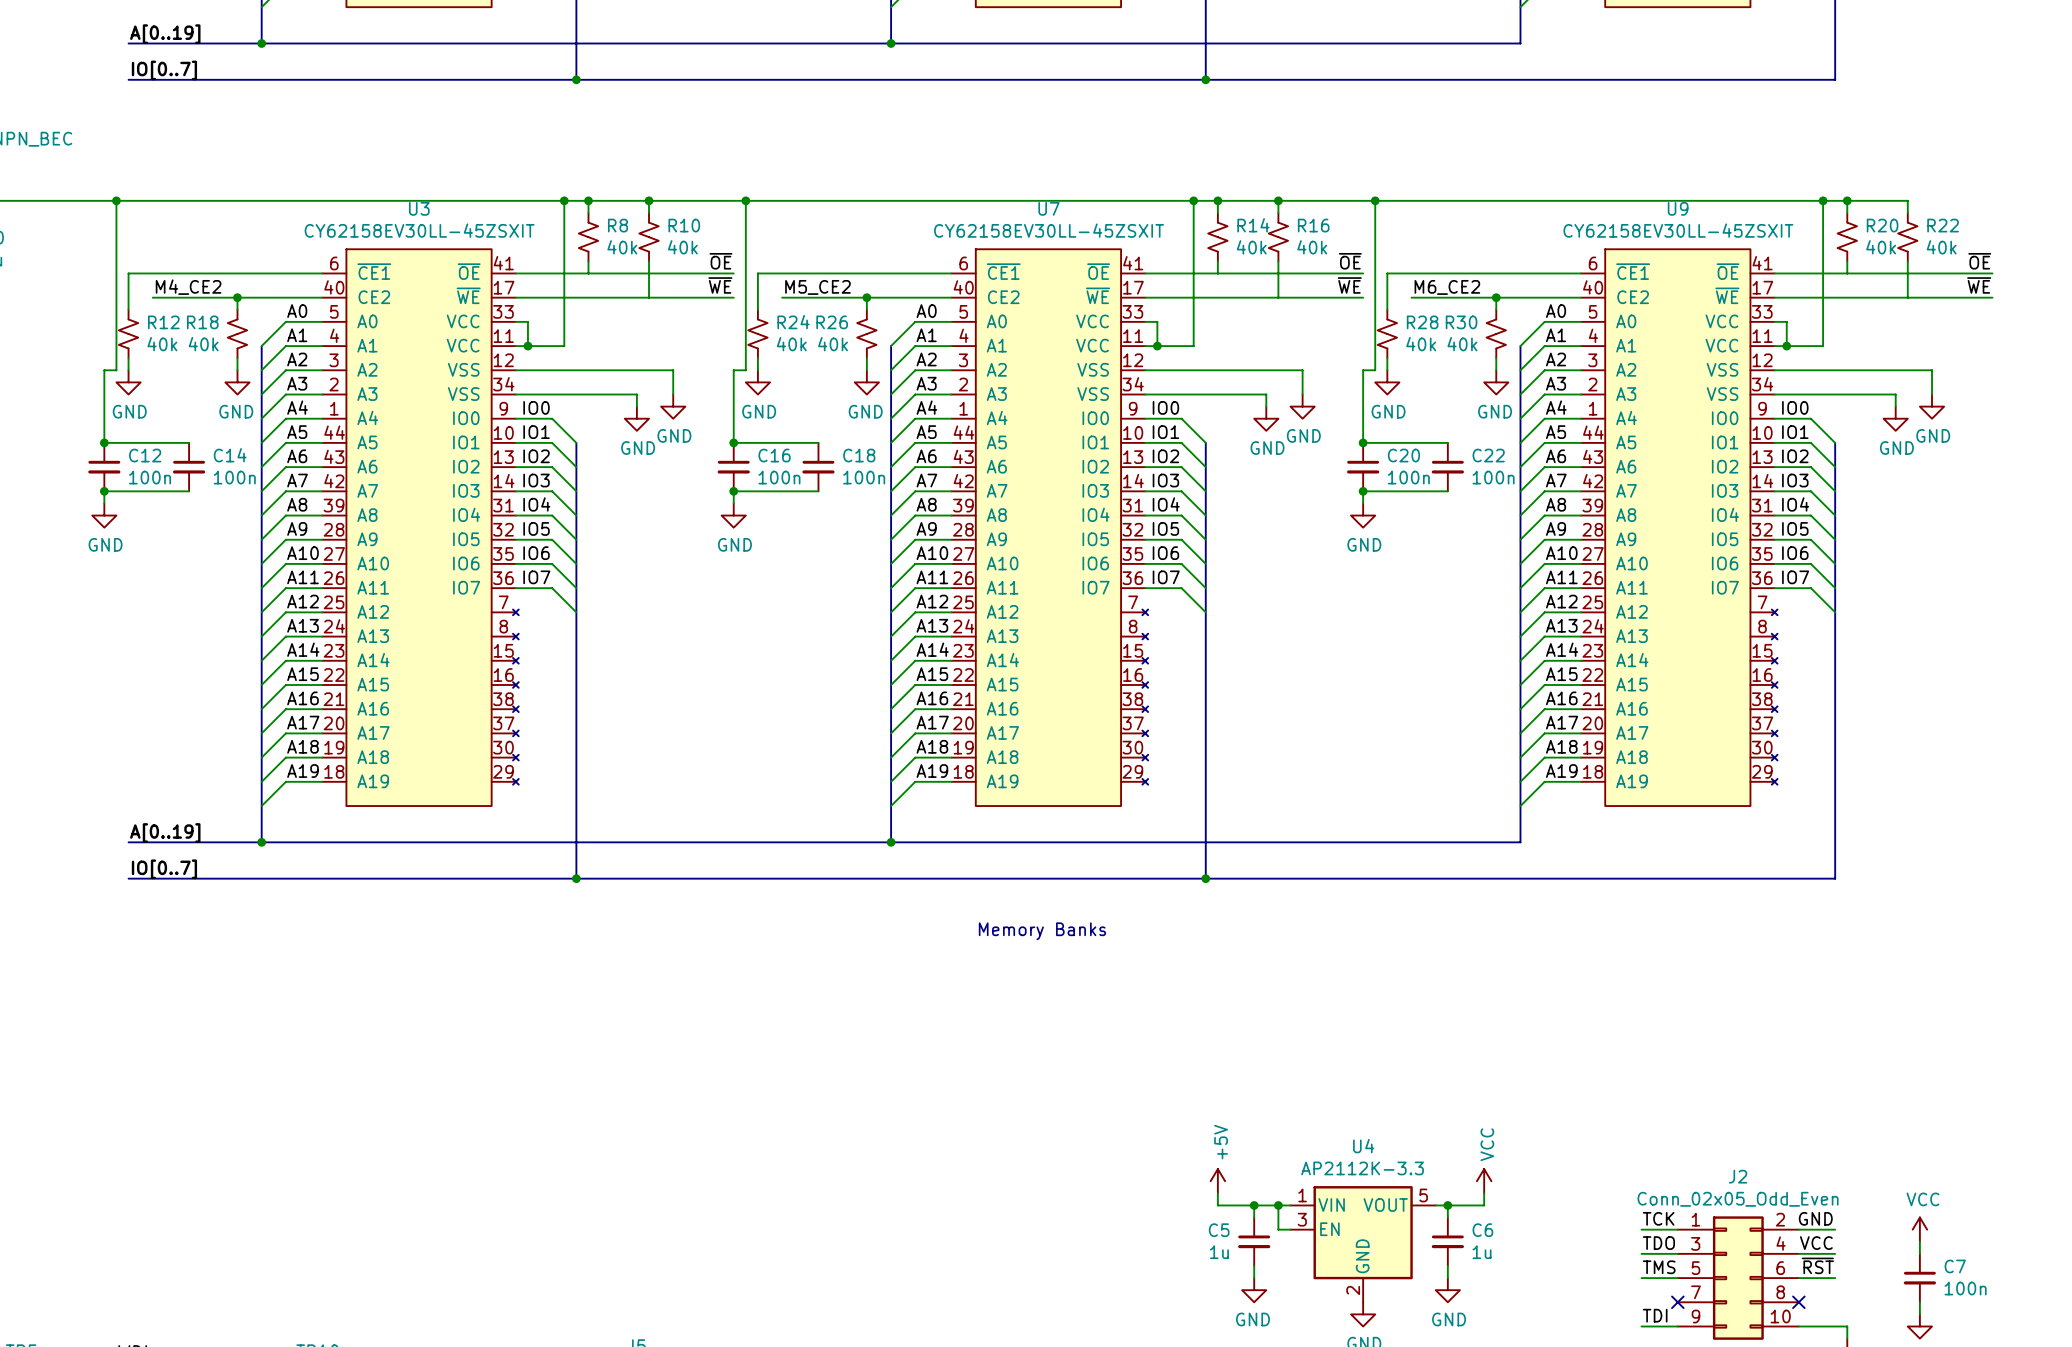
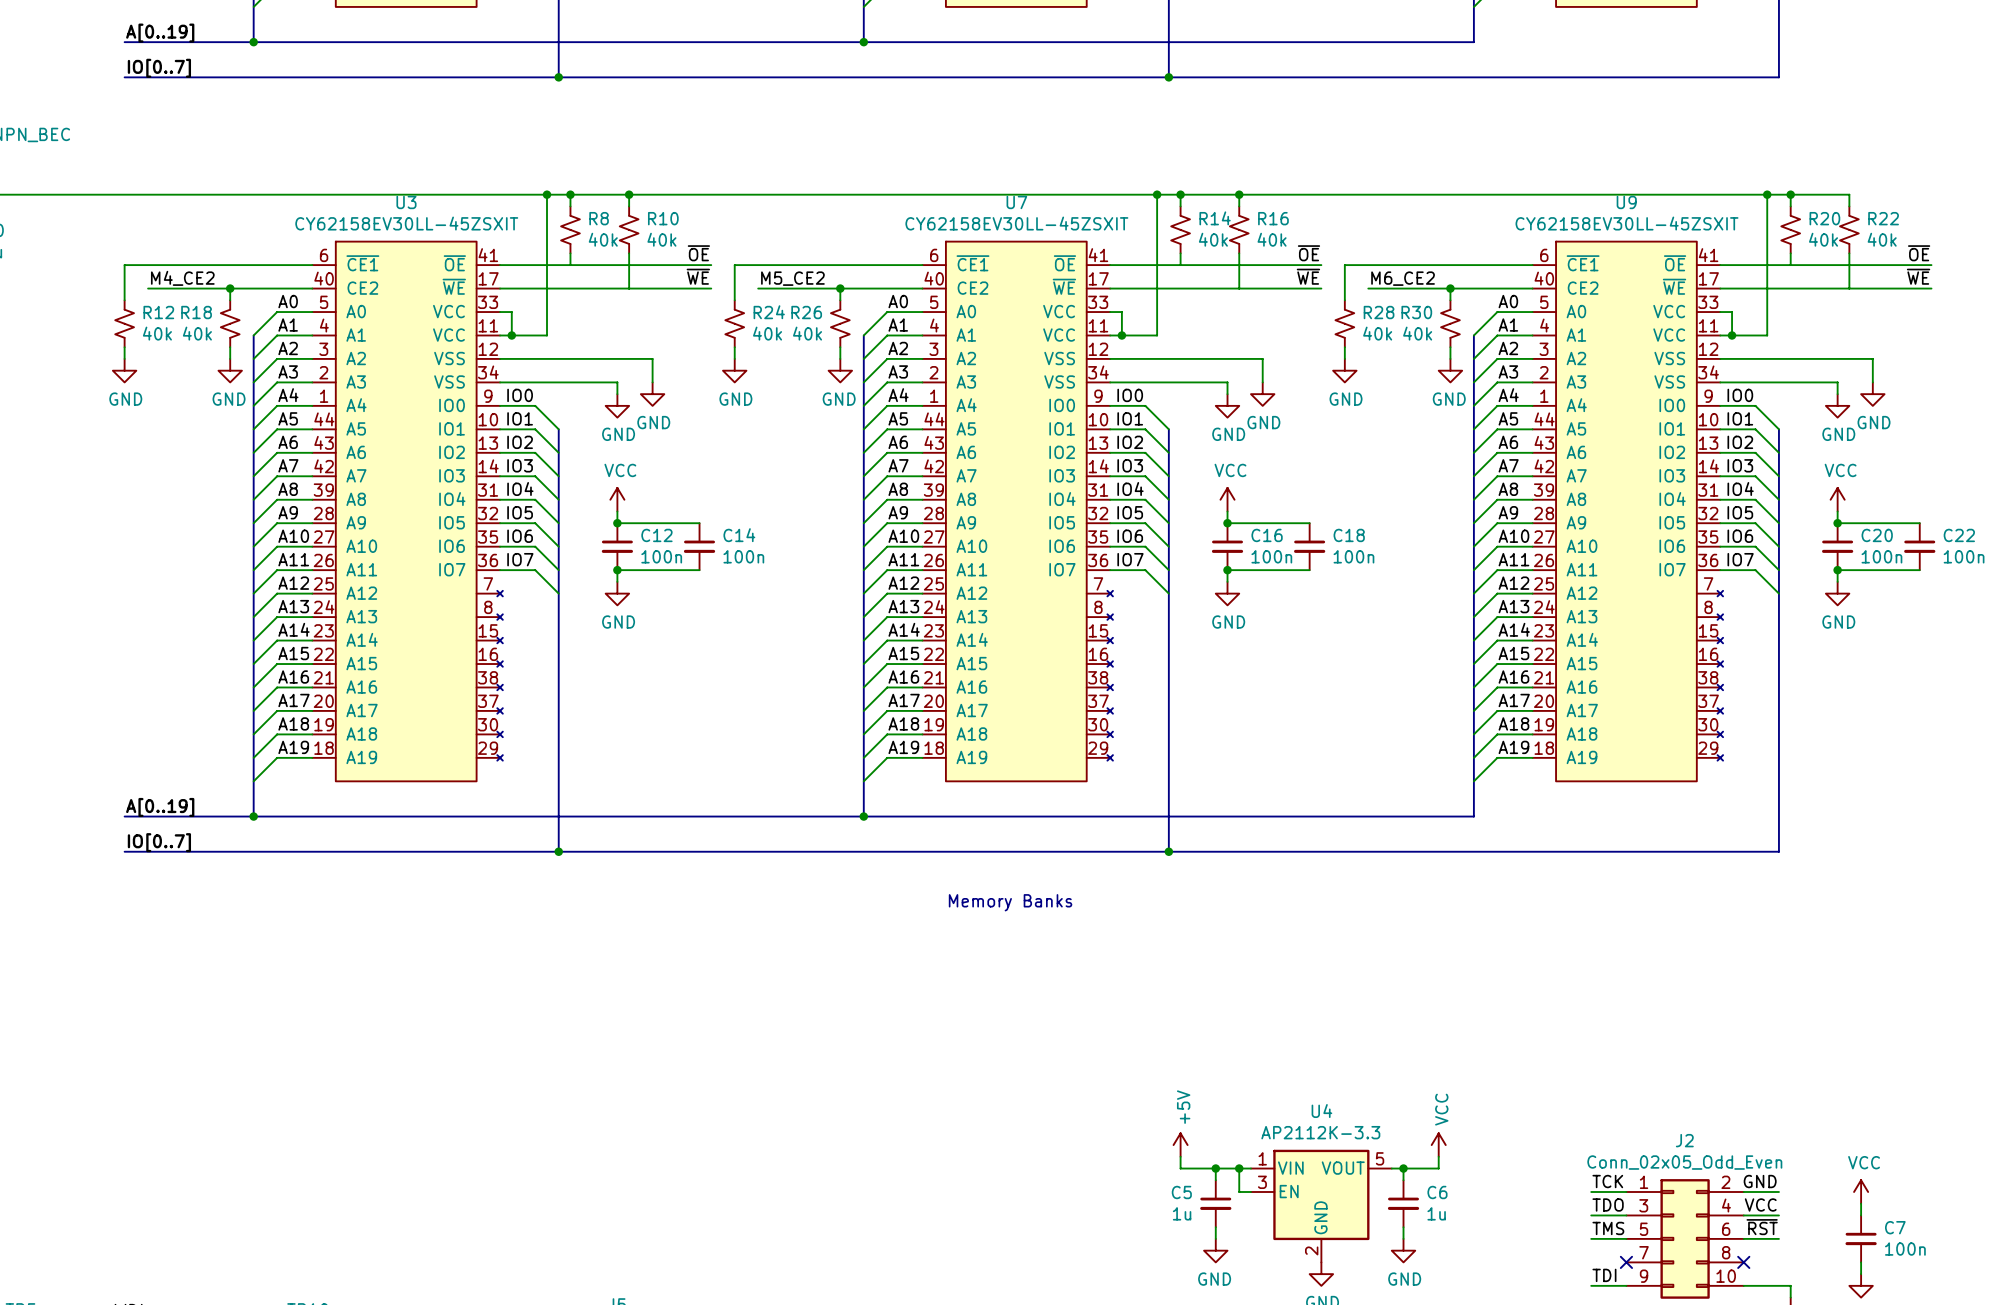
wire: (116, 200) (116, 370) (104, 370) (104, 442) (189, 442) -> none
junction: (116, 200) -> none
wire: (745, 200) (745, 370) (733, 370) (733, 442) (818, 442) -> none
junction: (745, 200) -> none
wire: (1375, 200) (1375, 370) (1363, 370) (1363, 442) (1447, 442) -> none
junction: (1375, 200) -> none
junction: (104, 442) -> none
junction: (733, 442) -> none
junction: (1363, 442) -> none
C12 position: (104, 467) -> (617, 546)
C14 position: (189, 467) -> (699, 546)
C16 position: (733, 467) -> (1227, 546)
C18 position: (818, 467) -> (1309, 546)
C20 position: (1363, 467) -> (1837, 546)
C22 position: (1447, 467) -> (1919, 546)
junction: (104, 491) -> none
wire: (189, 491) (104, 491) (104, 503) -> none
junction: (733, 491) -> none
wire: (818, 491) (733, 491) (733, 503) -> (699, 570) (617, 570) (617, 581)
junction: (1363, 491) -> none
wire: (1447, 491) (1363, 491) (1363, 503) -> (1309, 570) (1227, 570) (1227, 581)
power symbol: GND (104, 515) -> none
power symbol: none -> VCC (617, 499)
power symbol position: GND (733, 515) -> GND (617, 593)
power symbol: none -> VCC (1227, 499)
power symbol position: GND (1363, 515) -> GND (1227, 593)
power symbol: none -> VCC (1837, 499)
wire: none -> (617, 511) (617, 523) (699, 523)
wire: none -> (1227, 511) (1227, 523) (1309, 523)
wire: none -> (1837, 511) (1837, 523) (1919, 523)
junction: none -> (617, 523)
junction: none -> (1227, 523)
junction: none -> (1837, 523)
junction: none -> (617, 570)
junction: none -> (1227, 570)
junction: none -> (1837, 570)
wire: none -> (1919, 570) (1837, 570) (1837, 581)
power symbol: none -> GND (1837, 593)

